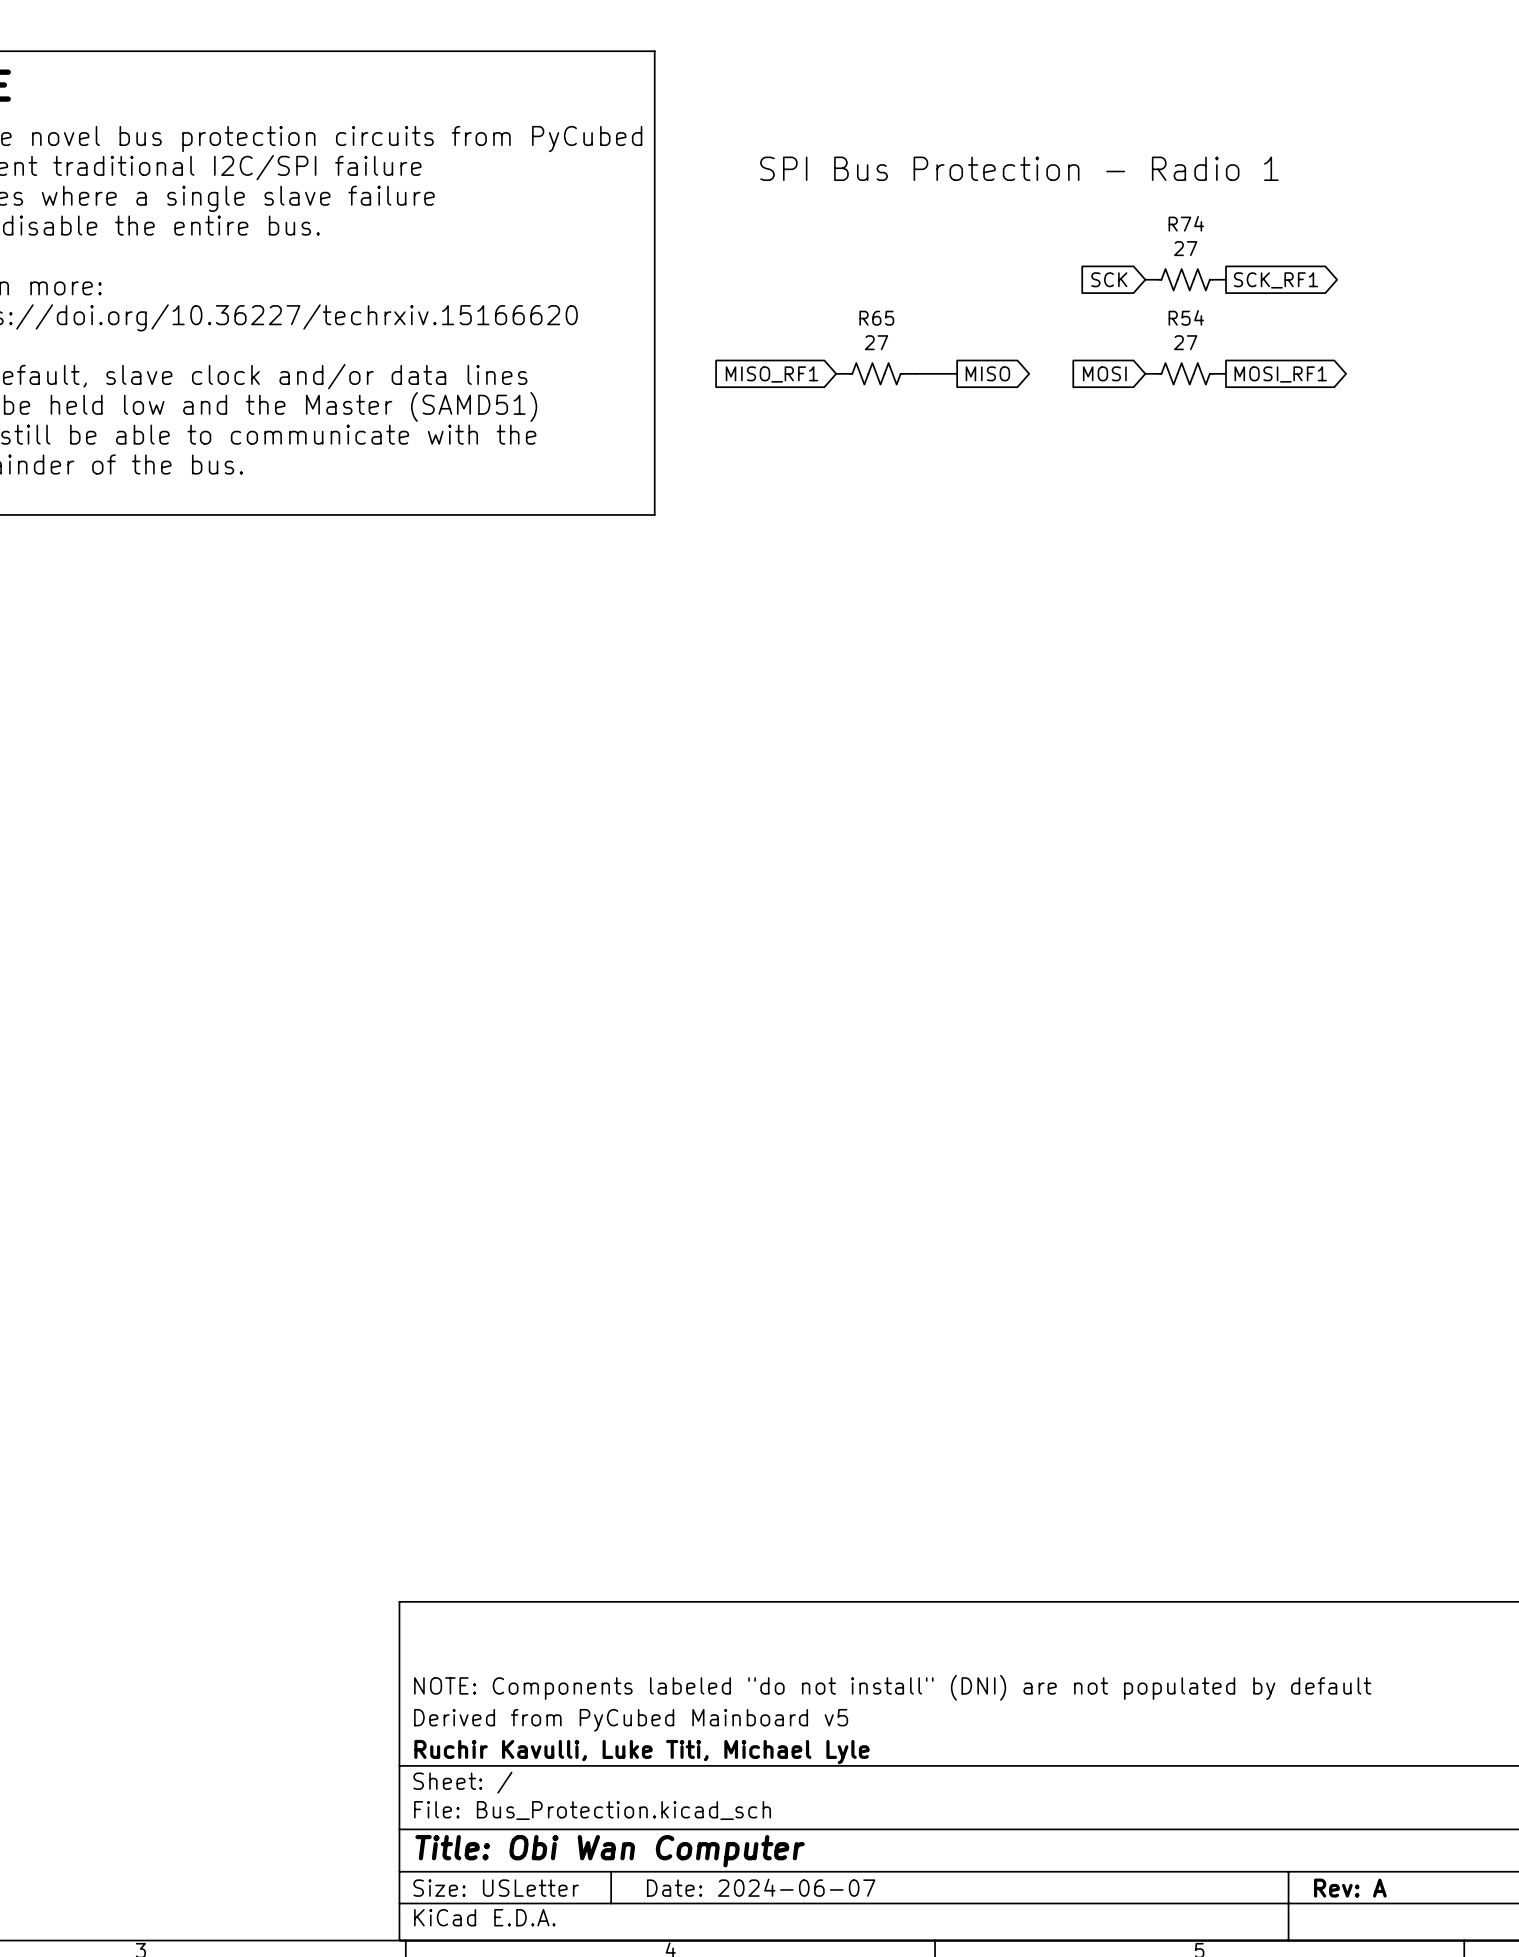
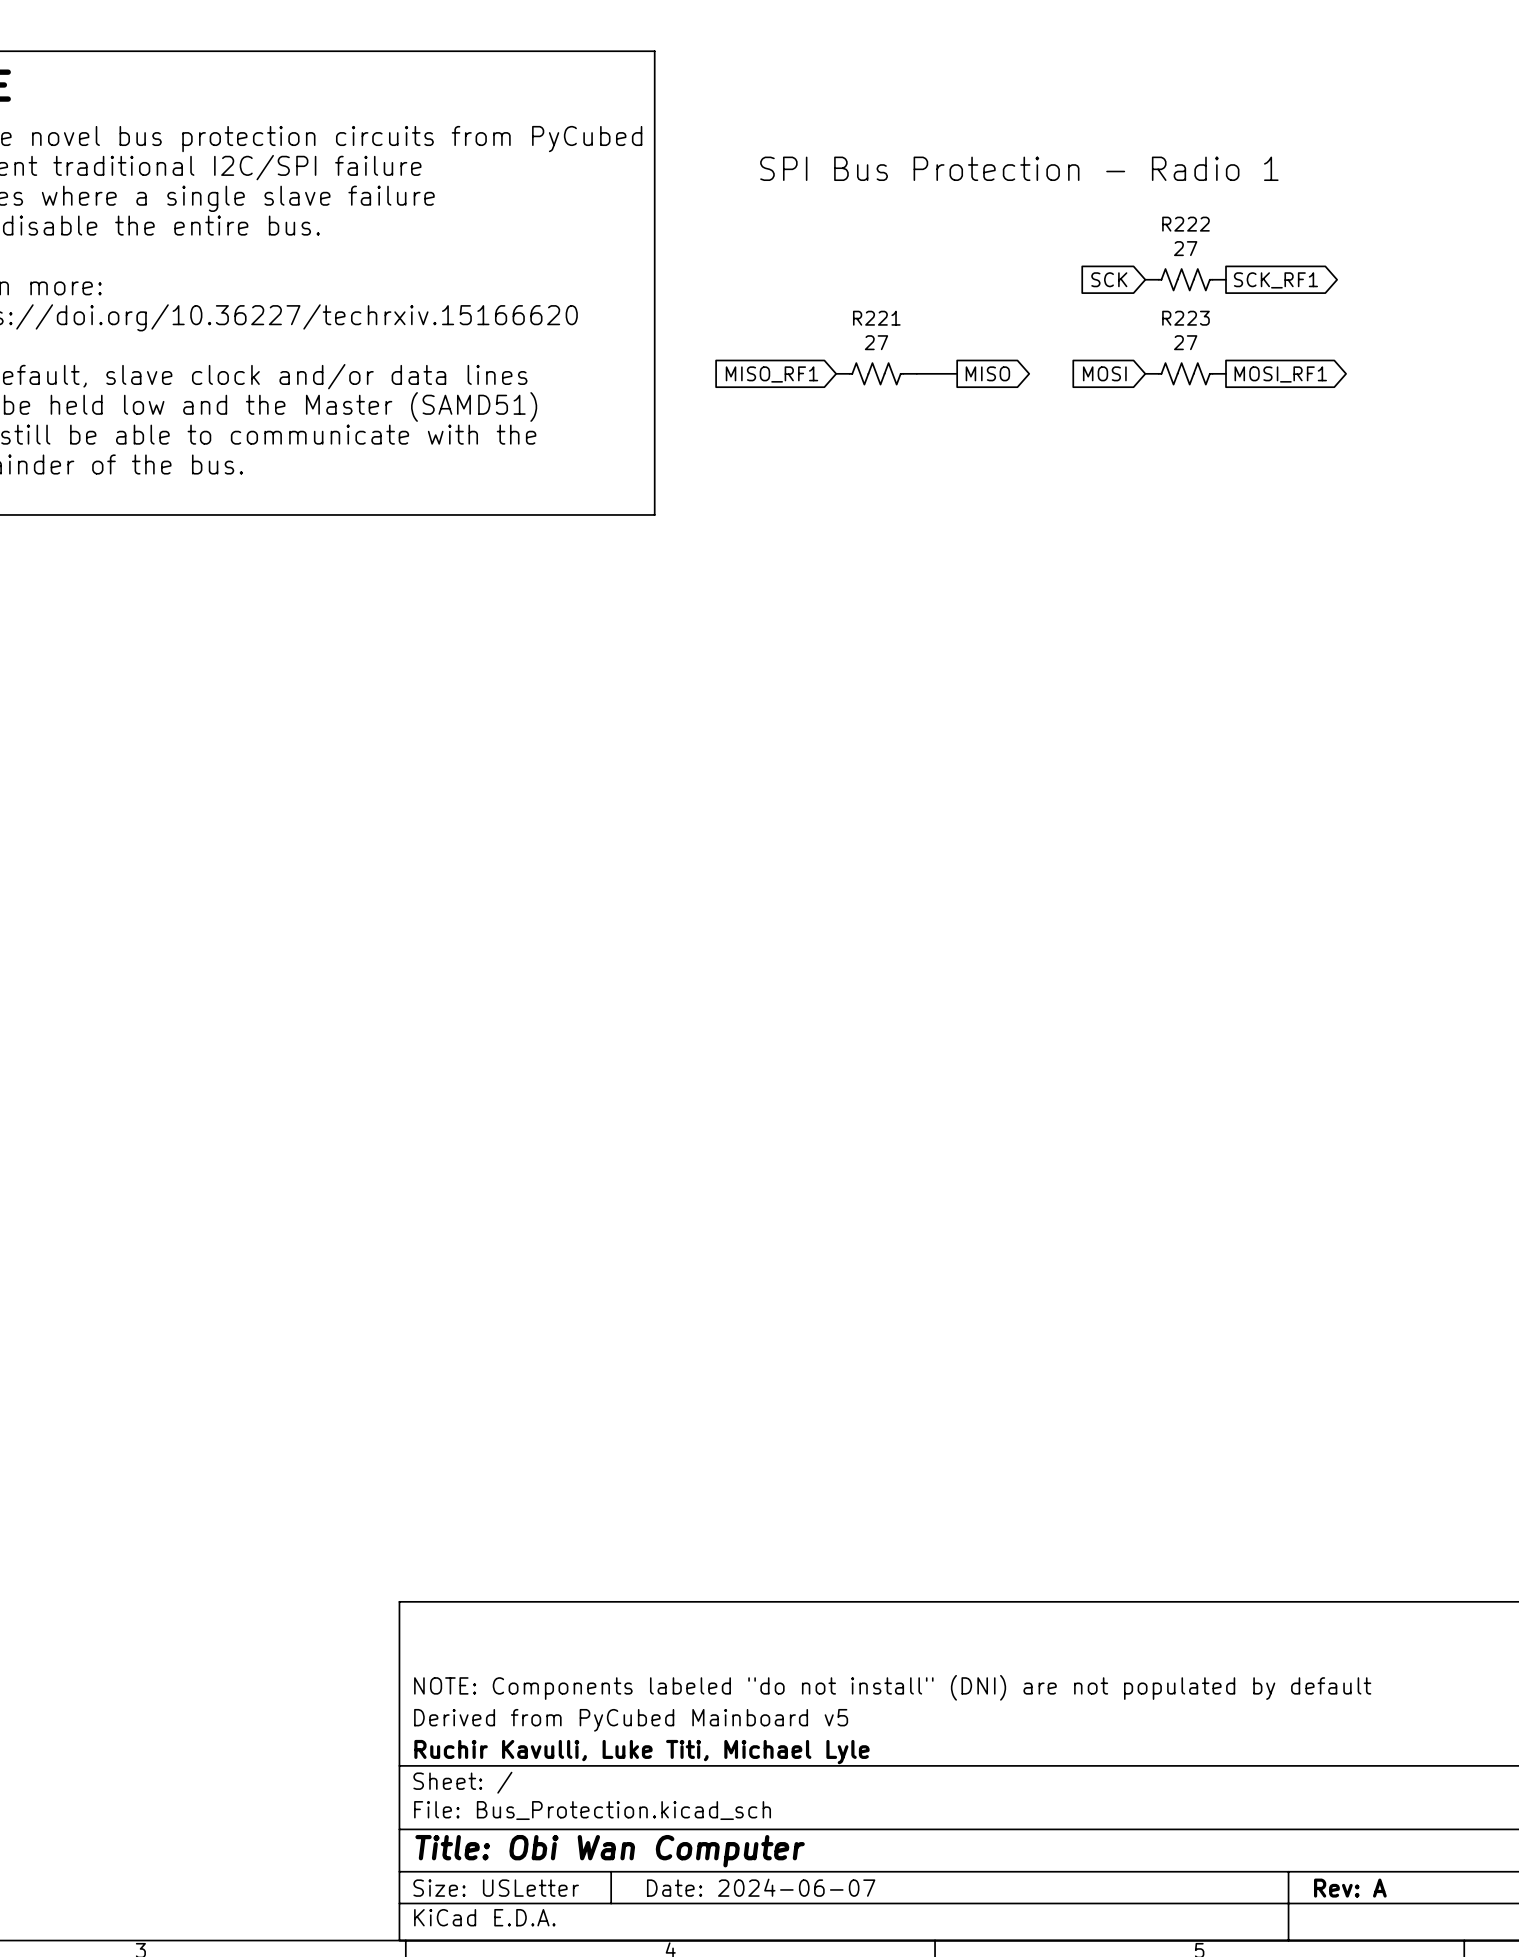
R74 name: R74 (1186, 223) -> R222 (1185, 224)
R54 name: R54 (1186, 317) -> R223 (1185, 318)
R65 name: R65 (876, 318) -> R221 (876, 318)

